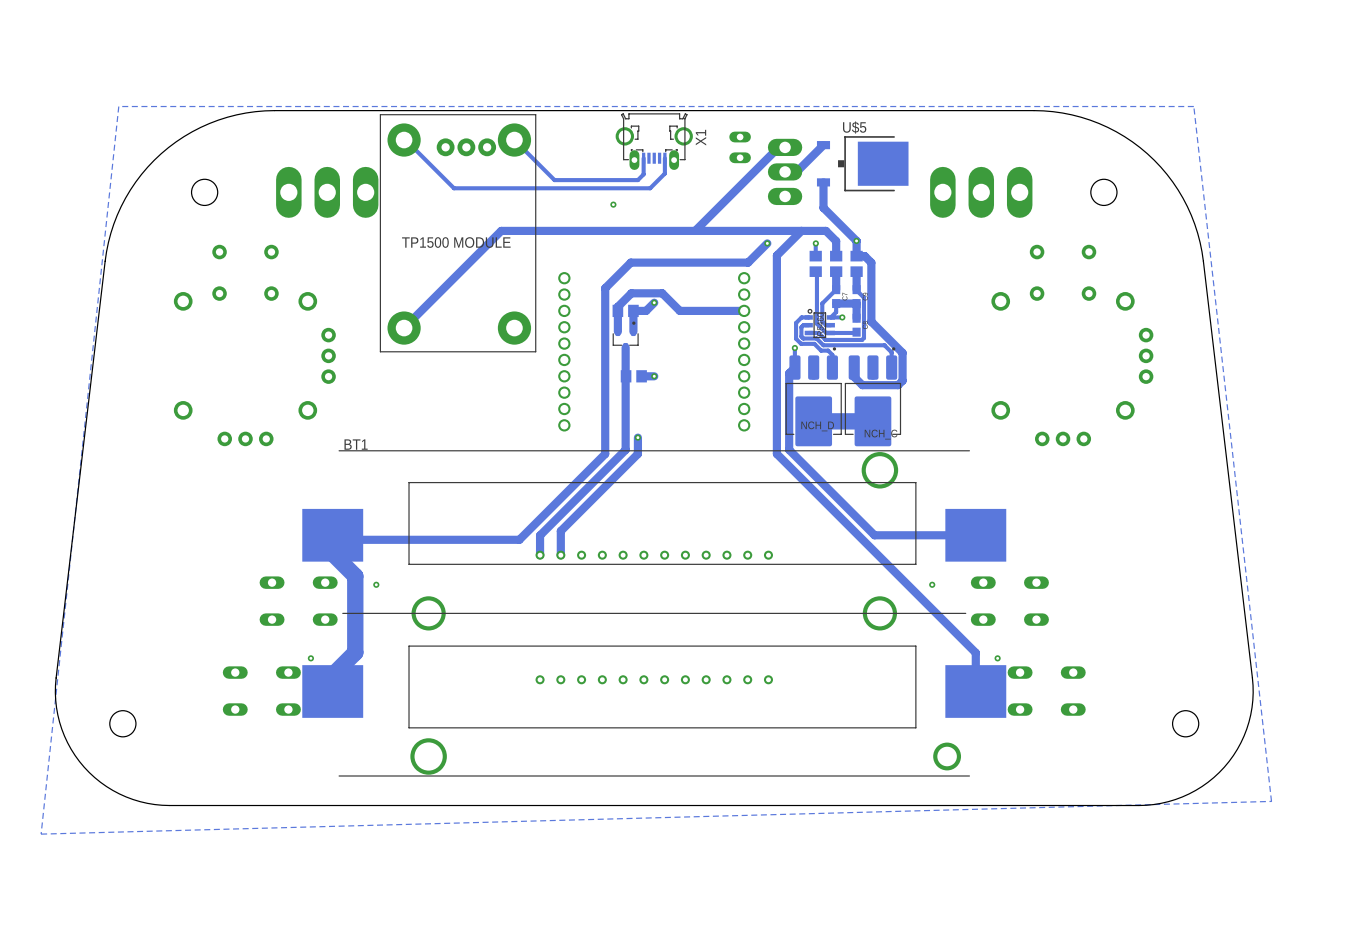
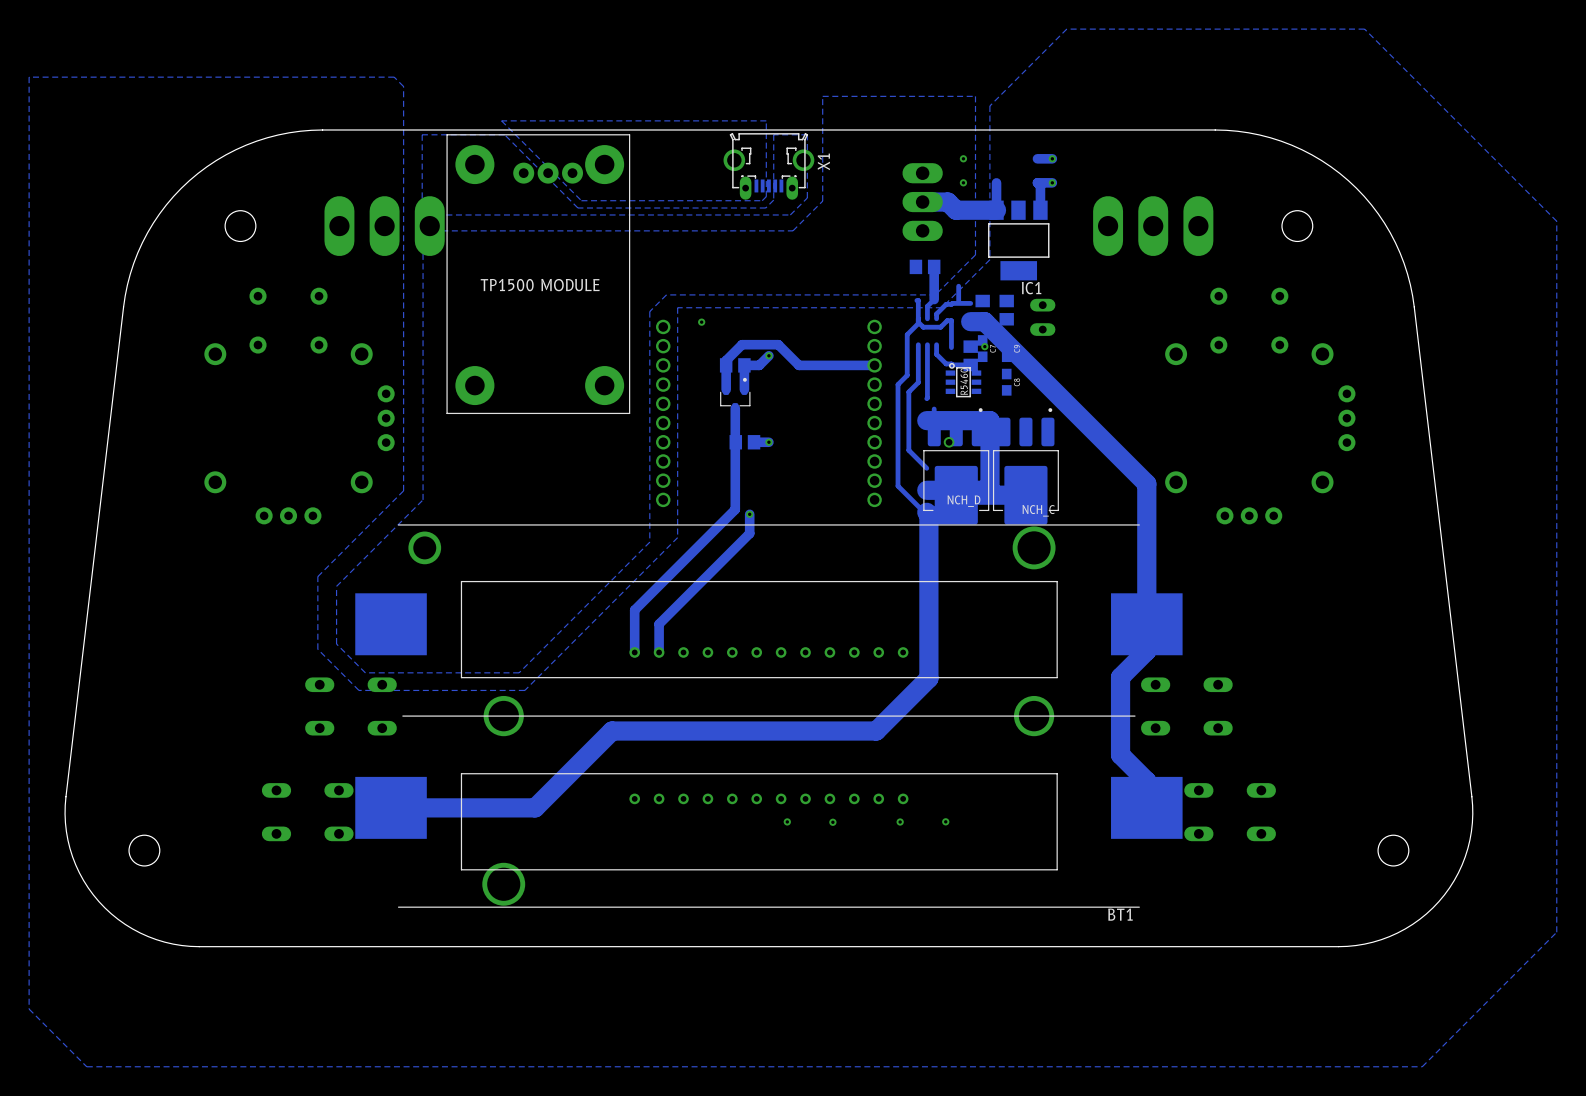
zone outline: none -> (975, 96) (975, 254) (935, 294) (666, 294) (649, 311) (649, 542) (519, 672) (365, 672) (336, 644) (336, 586) (423, 499) (423, 230) (792, 230) (822, 201) (822, 96) (975, 96)
zone outline: none -> (766, 120) (766, 196) (762, 200) (581, 200) (501, 120) (766, 120)
zone outline: (1193, 106) (1271, 801) (41, 834) (118, 106) (1193, 106) -> (1364, 29) (1556, 221) (1556, 932) (1422, 1066) (86, 1066) (29, 1009) (29, 77) (394, 77) (403, 86) (403, 490) (317, 576) (317, 649) (358, 690) (524, 690) (677, 537) (677, 307) (941, 307) (989, 259) (989, 105) (1066, 29) (1364, 29)
zone outline: none -> (807, 134) (773, 134) (773, 200) (765, 208) (577, 208) (504, 134) (422, 134) (422, 210) (427, 214) (790, 214) (807, 197) (807, 134)
via: none -> (963, 158)
track: none -> (1052, 158) (1037, 158)
via: none -> (1052, 158)
track: (404, 140) (453, 188) (650, 188) (664, 173) (664, 158) -> none
track: (514, 140) (554, 180) (637, 180) (643, 174) (643, 158) -> none
track: (823, 145) (796, 171) -> (996, 182) (996, 210) (956, 210) (947, 202) (936, 202)
part position: (740, 147) -> (1042, 317)
track: (785, 147) (778, 147) (695, 230) -> none
via: none -> (963, 182)
track: none -> (1052, 182) (1037, 182) (1040, 185) (1040, 210)
via: none -> (1052, 182)
U$5: (862, 163) -> none
track: (823, 182) (823, 207) (856, 241) (856, 256) (864, 256) (871, 262) (871, 321) (902, 352) (902, 380) (898, 385) (862, 385) (853, 376) (854, 367) -> none
via: (613, 204) -> none
IC1: none -> (1018, 240)
part: none -> (925, 266)
track: none -> (934, 266) (934, 299) (927, 306) (927, 318)
track: (801, 231) (776, 255) (776, 453) (975, 652) (975, 664) -> (971, 322) (984, 321) (1146, 483) (1146, 650) (1120, 677) (1120, 754) (1146, 781)
via: (856, 240) -> none
track: (767, 243) (748, 262) (630, 262) (605, 288) (605, 453) -> none
via: (767, 243) -> none
via: (815, 243) -> none
track: none -> (916, 300) (918, 323) (907, 334) (907, 375) (898, 384) (898, 486) (924, 512) (928, 514) (928, 678) (876, 731) (612, 731) (535, 807) (391, 807)
track: (836, 256) (836, 241) (825, 230) (501, 230) (404, 328) -> none
track: none -> (970, 303) (946, 304) (936, 313) (936, 318)
part: (815, 263) -> none
track: (815, 271) (816, 323) (826, 332) (856, 332) -> none
track: (836, 271) (836, 289) (822, 303) (822, 321) (825, 325) (830, 325) -> none
track: (856, 271) (856, 290) (863, 297) (863, 338) (862, 339) (825, 339) (818, 332) (808, 332) -> none
via: none -> (701, 322)
track: none -> (918, 322) (923, 327) (940, 327) (947, 320) (951, 320) (951, 347)
track: none -> (918, 344) (918, 382) (908, 392) (908, 450) (926, 468)
track: none -> (927, 344) (926, 398)
track: none -> (936, 344) (936, 354) (946, 363) (970, 364)
part: none -> (970, 355)
track: (808, 317) (801, 317) (796, 323) (796, 338) (801, 343) (814, 343) (821, 350) (828, 350) (832, 354) (832, 367) -> none
track: (842, 317) (830, 317) (836, 312) (836, 303) (856, 303) (856, 318) -> none
via position: (842, 317) -> (984, 346)
track: (808, 325) (801, 327) (801, 336) (803, 338) (816, 338) (823, 345) (884, 345) (891, 352) (891, 367) -> none
via: (794, 348) -> none
track: none -> (926, 420) (990, 420) (990, 490) (926, 490)
track: (794, 367) (789, 373) (789, 449) (874, 535) (975, 535) -> none
via: none -> (949, 442)
track: (625, 433) (625, 449) (540, 535) -> (735, 509) (711, 533)
track: (540, 519) (519, 539) (337, 539) -> (634, 610) (634, 629)
track: (337, 539) (332, 544) (332, 553) (355, 576) (355, 652) (332, 675) (332, 691) -> none
via: (376, 584) -> none
via: (932, 584) -> none
BT1 rotation: 0° (654, 613) -> 180° (768, 716)
via: (310, 658) -> none
via: (997, 658) -> none
via: none -> (787, 821)
via: none -> (832, 822)
via: none -> (900, 822)
via: none -> (945, 821)

